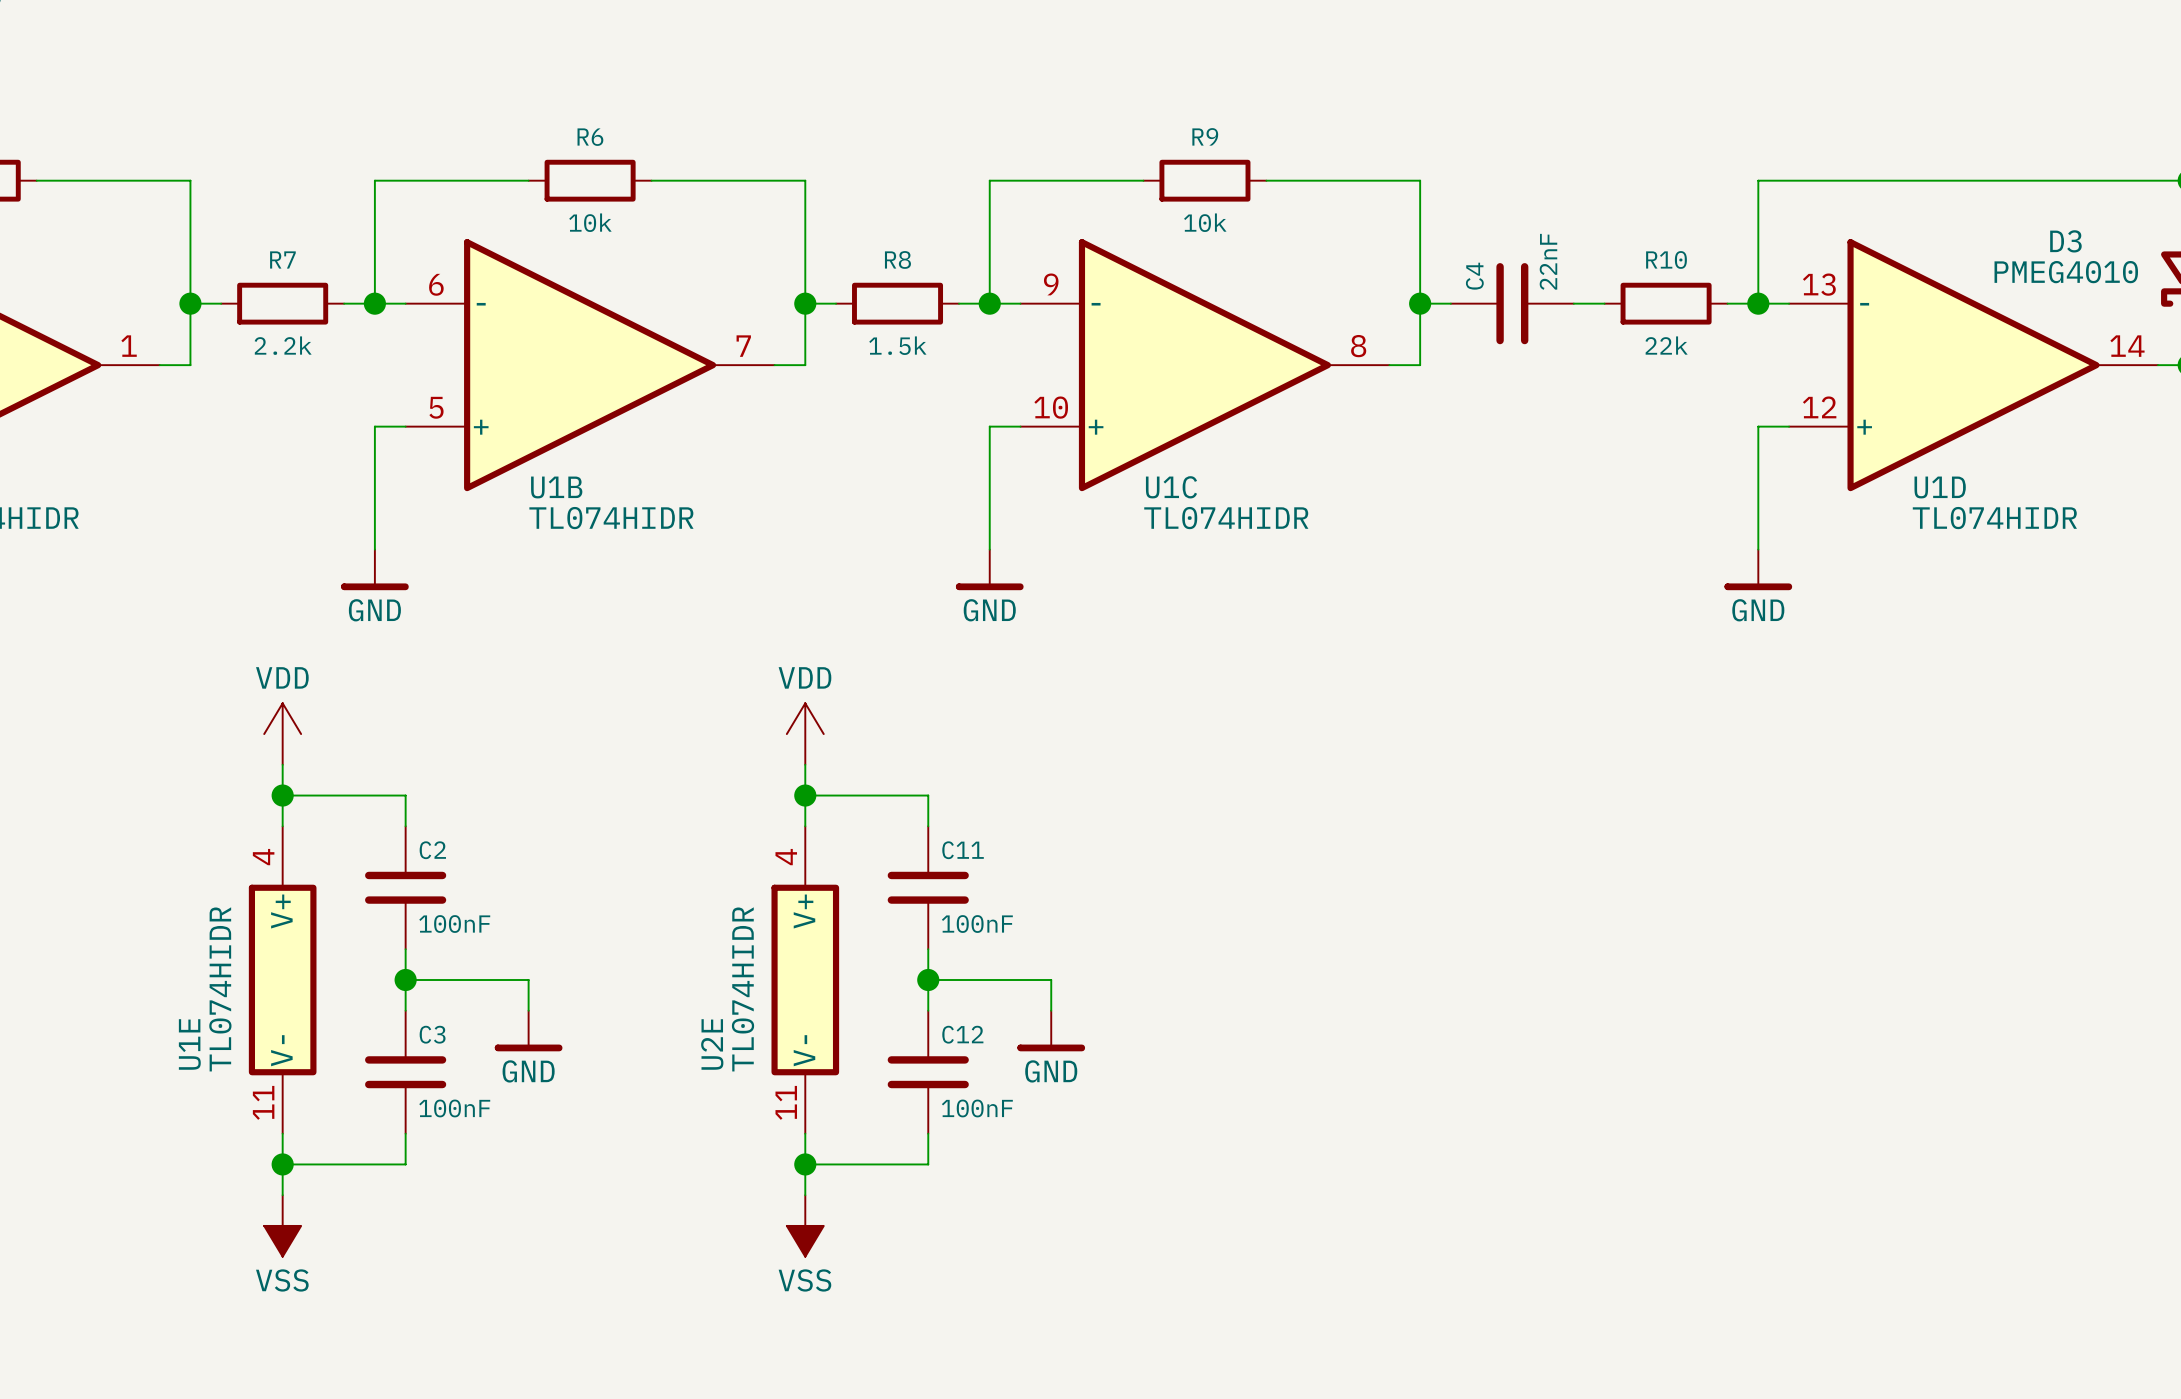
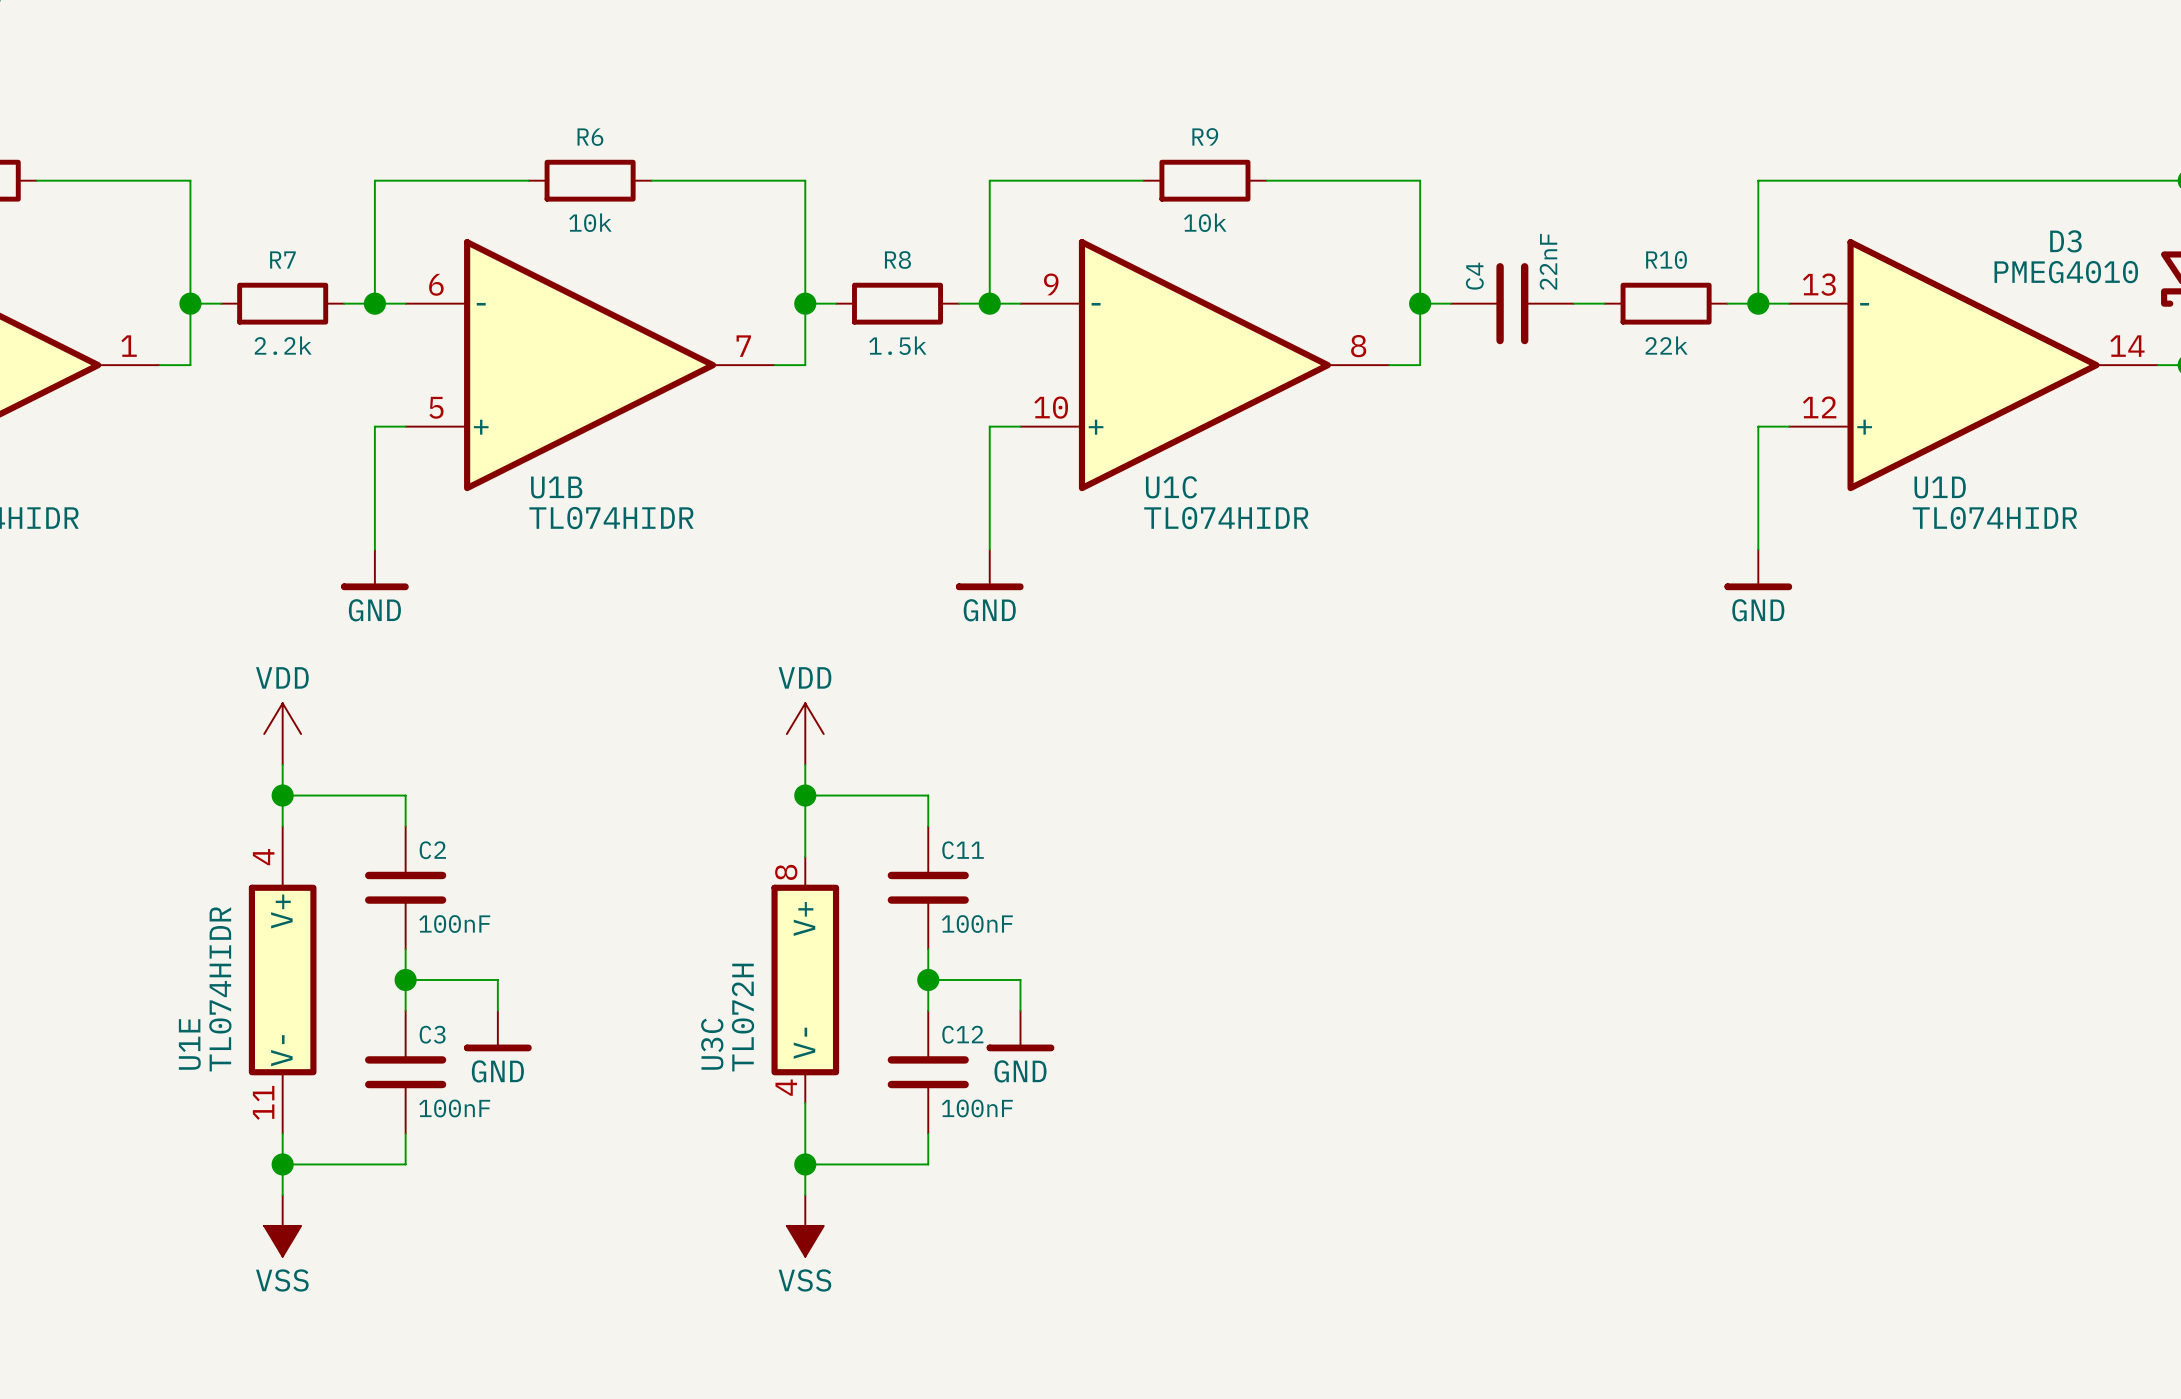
wire: (497, 980) (528, 980) (528, 1010) -> (497, 980) (497, 1010)
U2E: TL074HIDR (805, 980) -> none
U3C: none -> TL072H (805, 980)
wire: (1020, 980) (1051, 980) (1051, 1010) -> (1020, 980) (1020, 1010)
power symbol position: GND (528, 1031) -> GND (497, 1031)
power symbol position: GND (1051, 1031) -> GND (1020, 1031)

